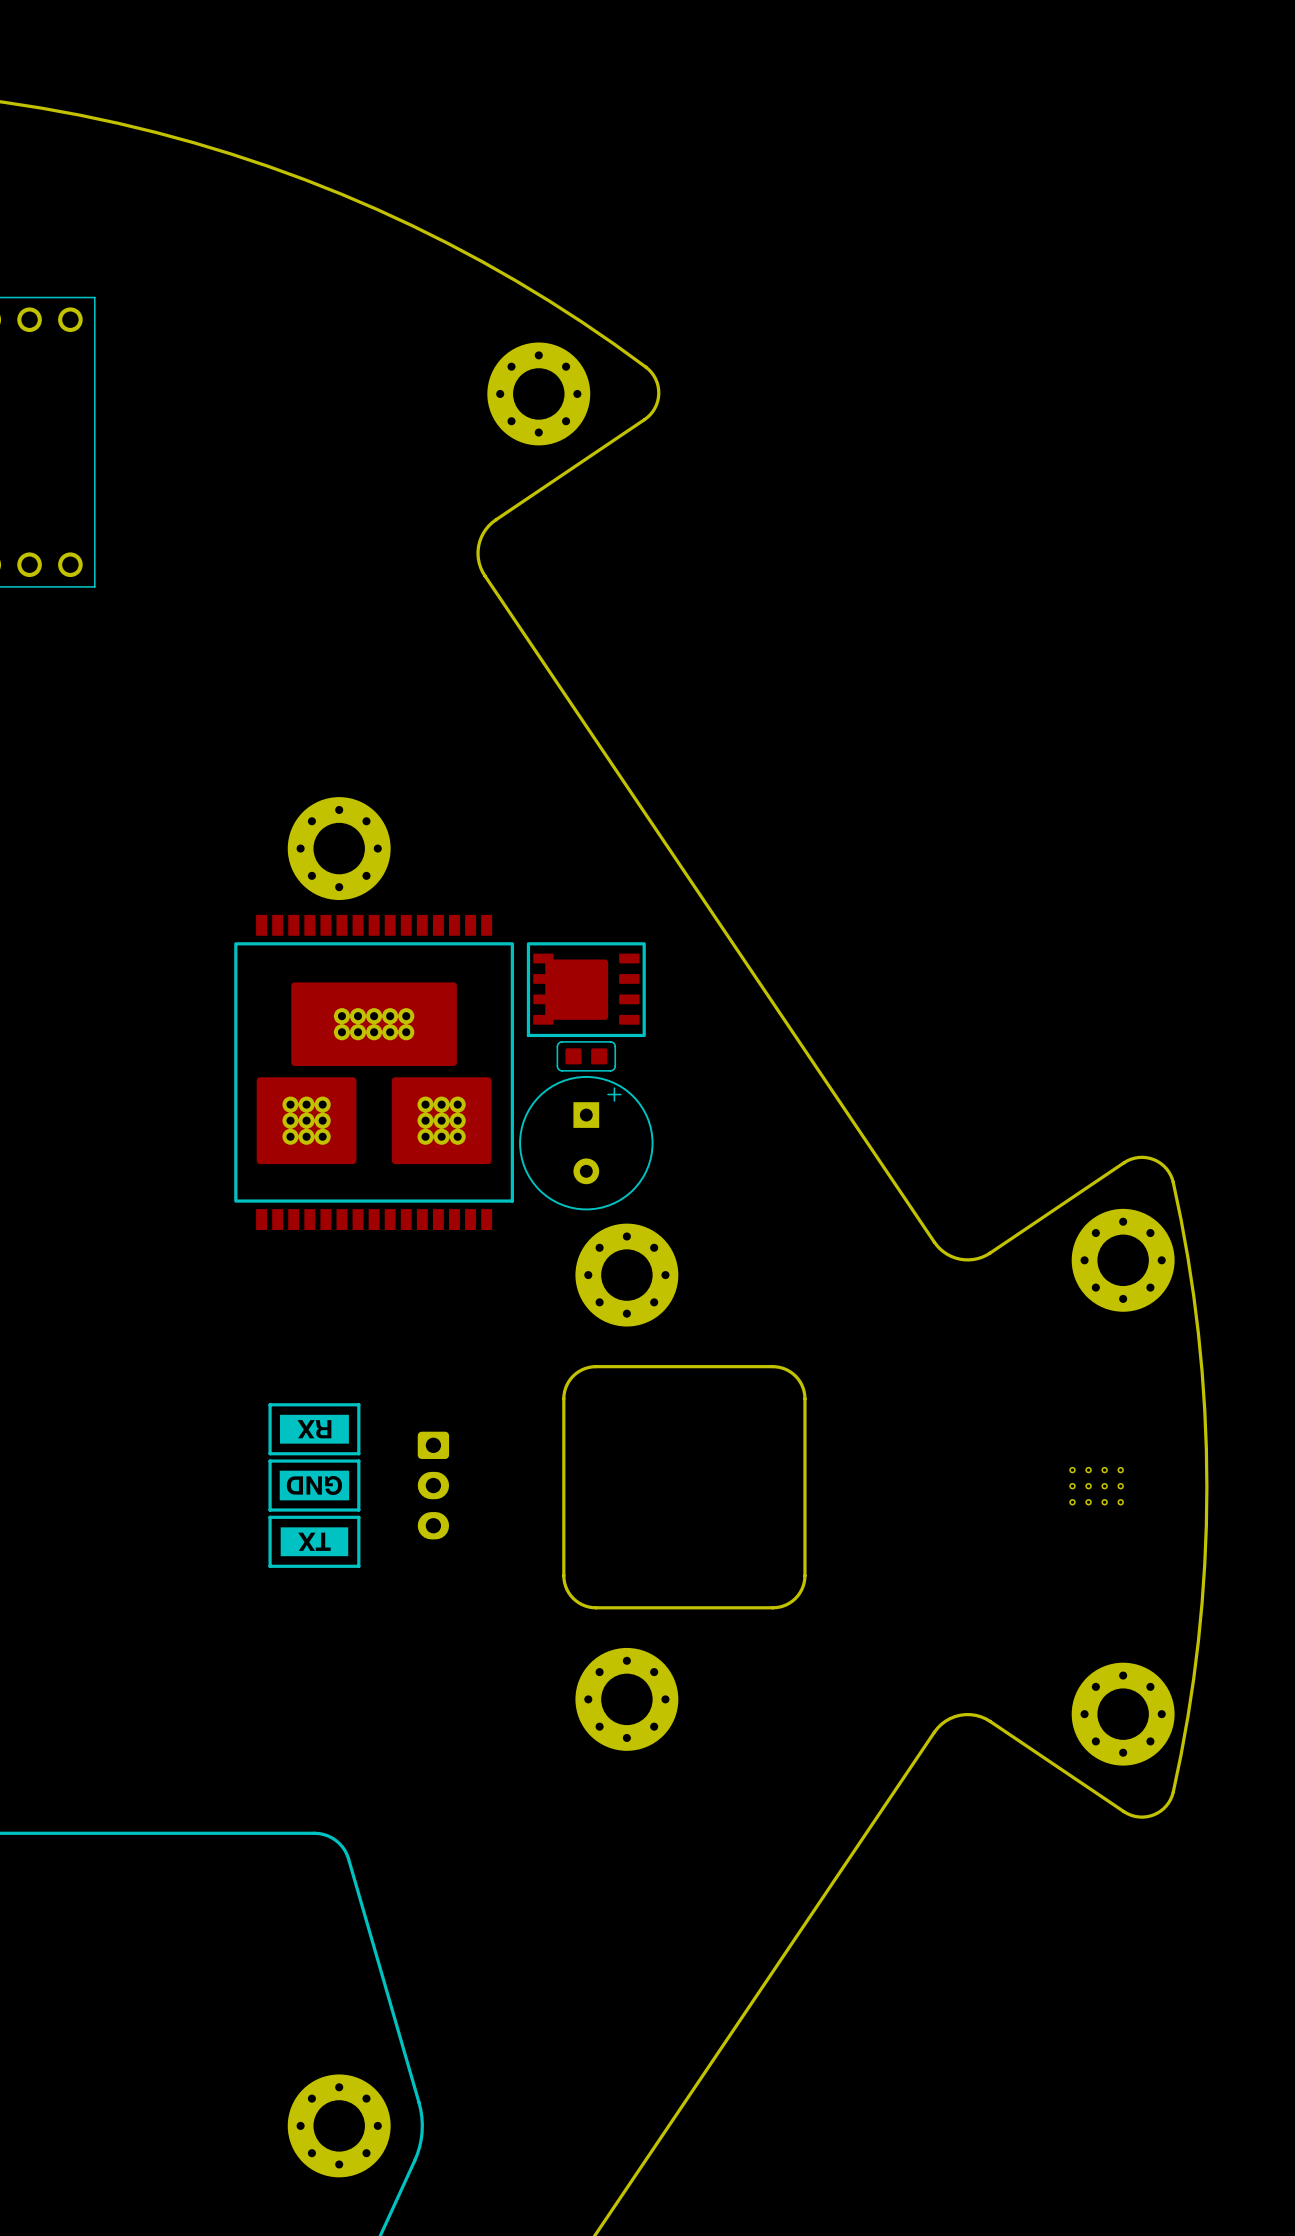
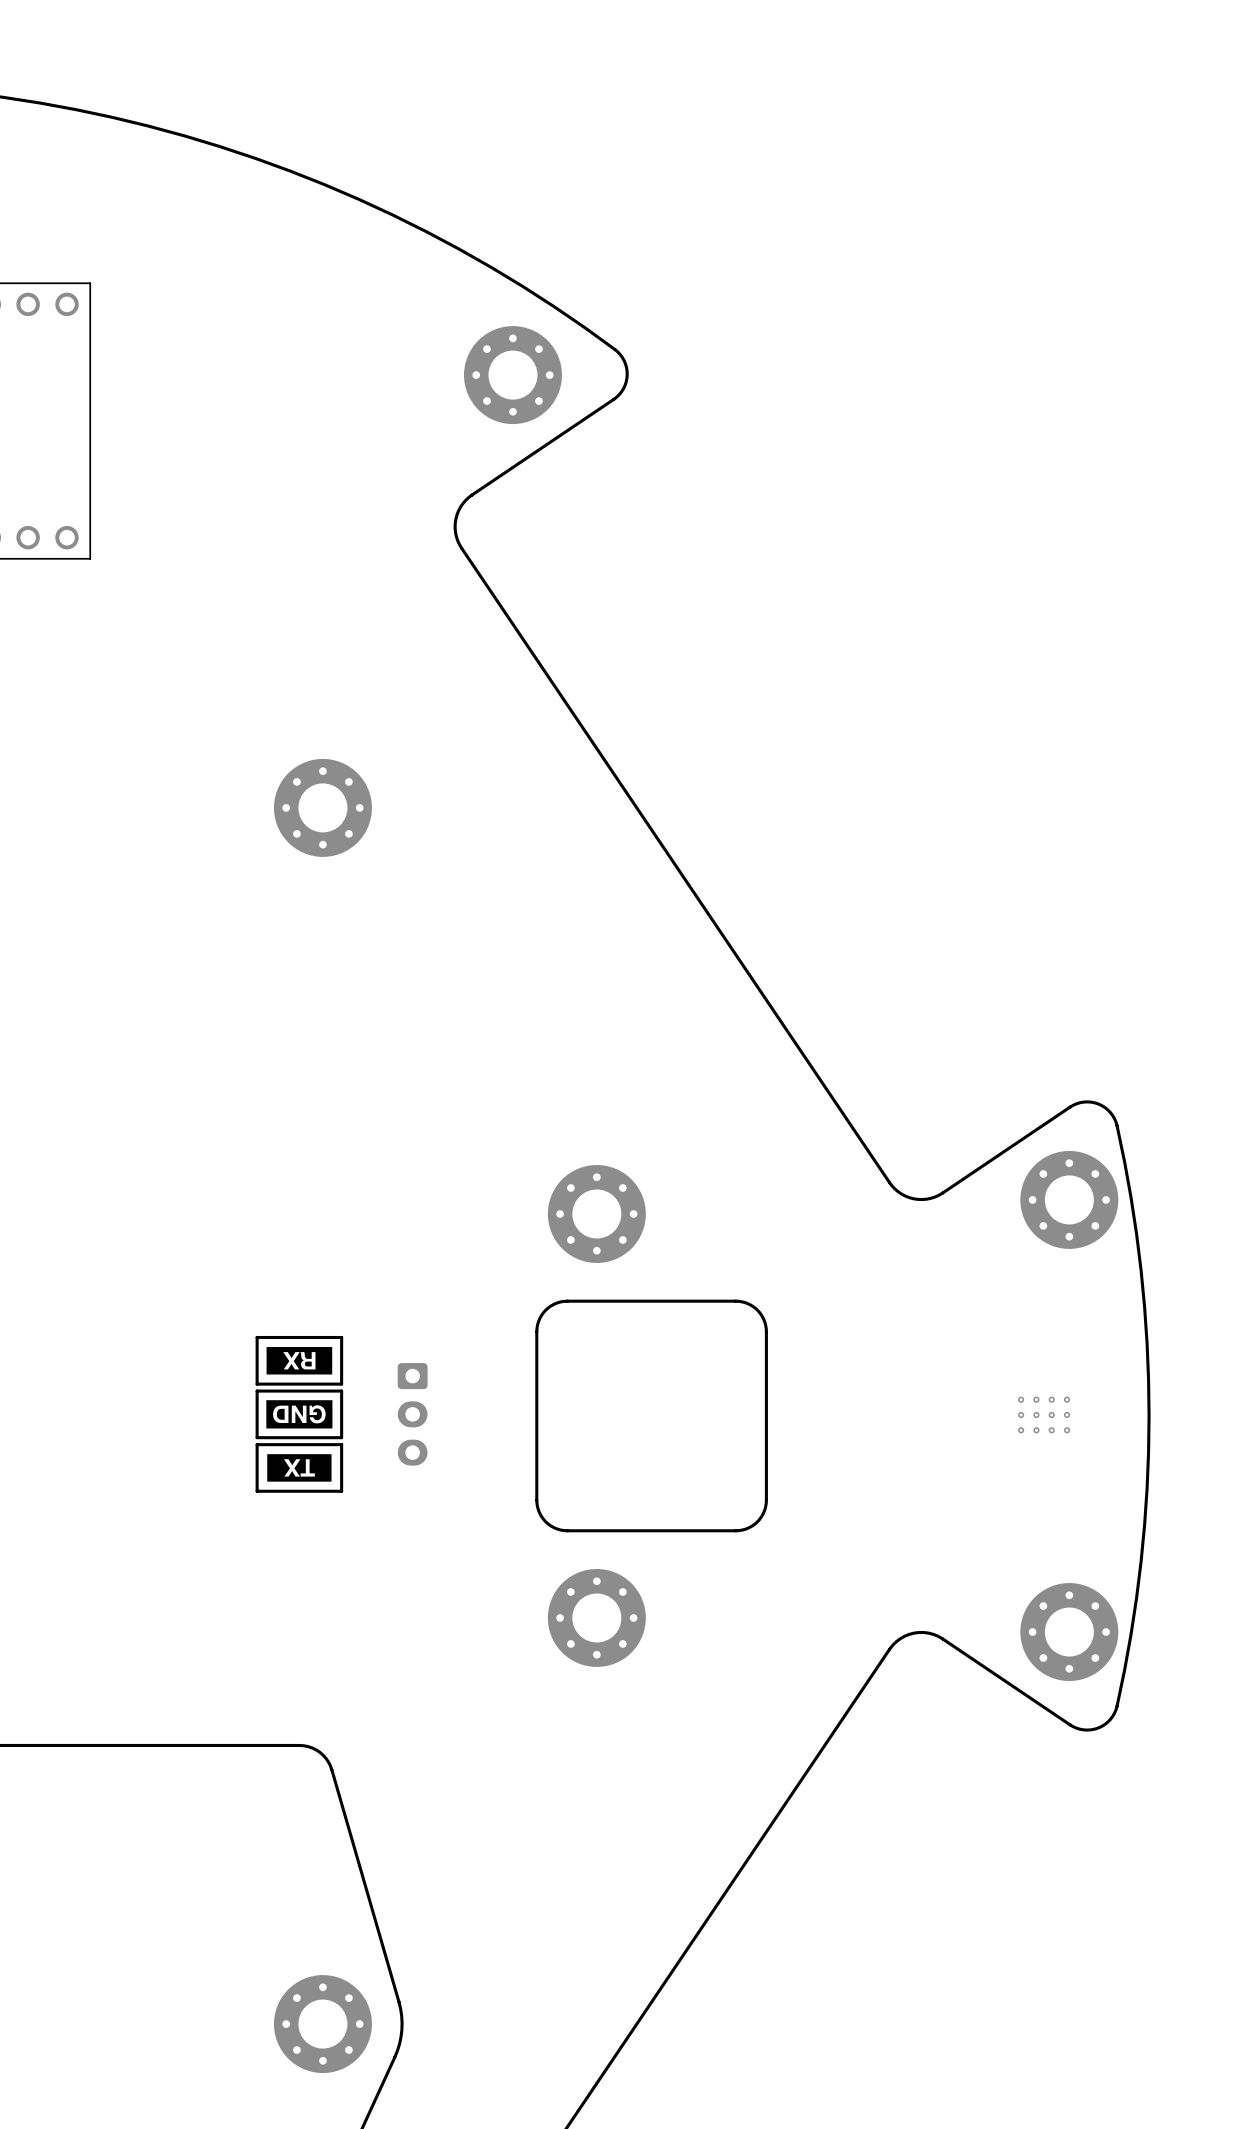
part: (586, 989) -> none
part: (586, 1056) -> none
part: (374, 1072) -> none
part: (586, 1143) -> none

